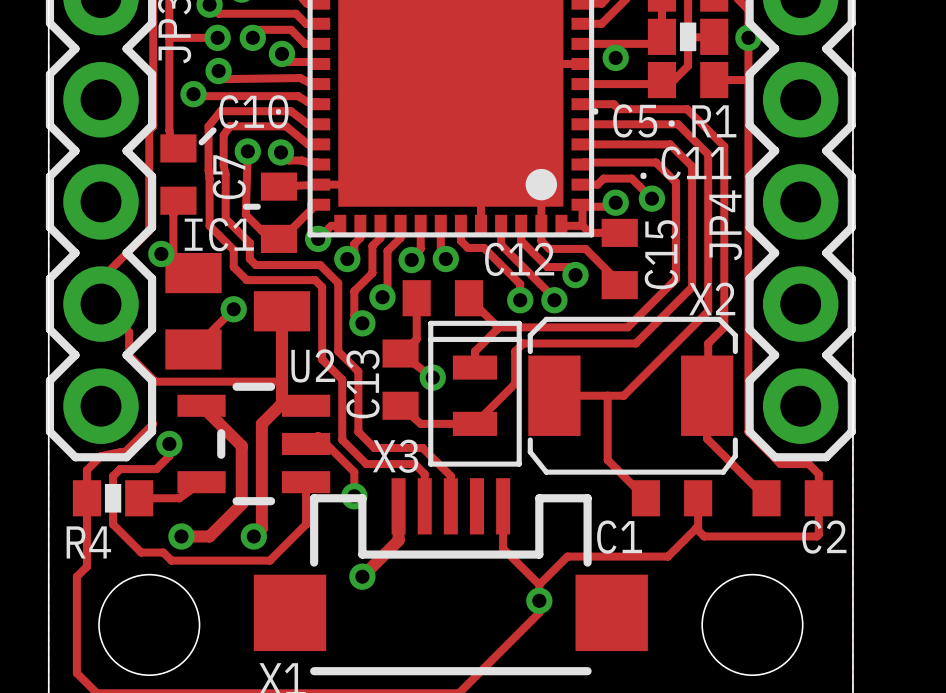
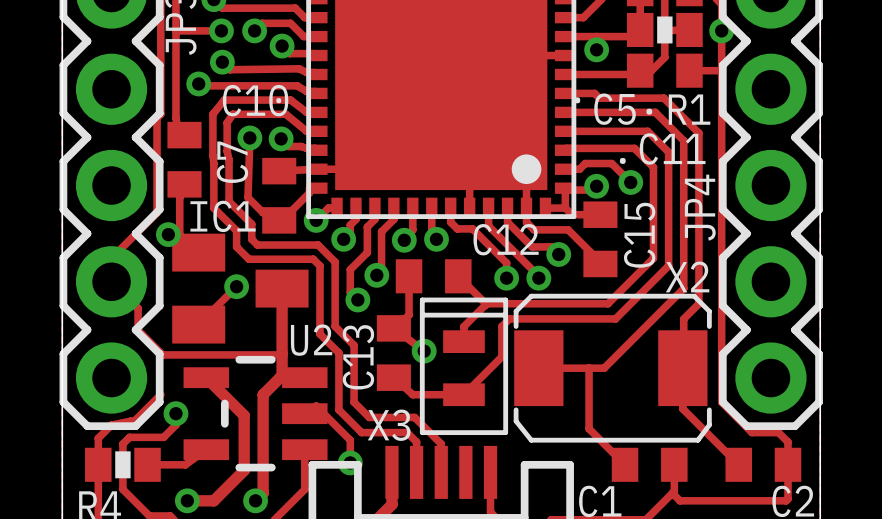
line: (213, 130) (201, 142) -> none
line: (245, 206) (257, 206) -> none

